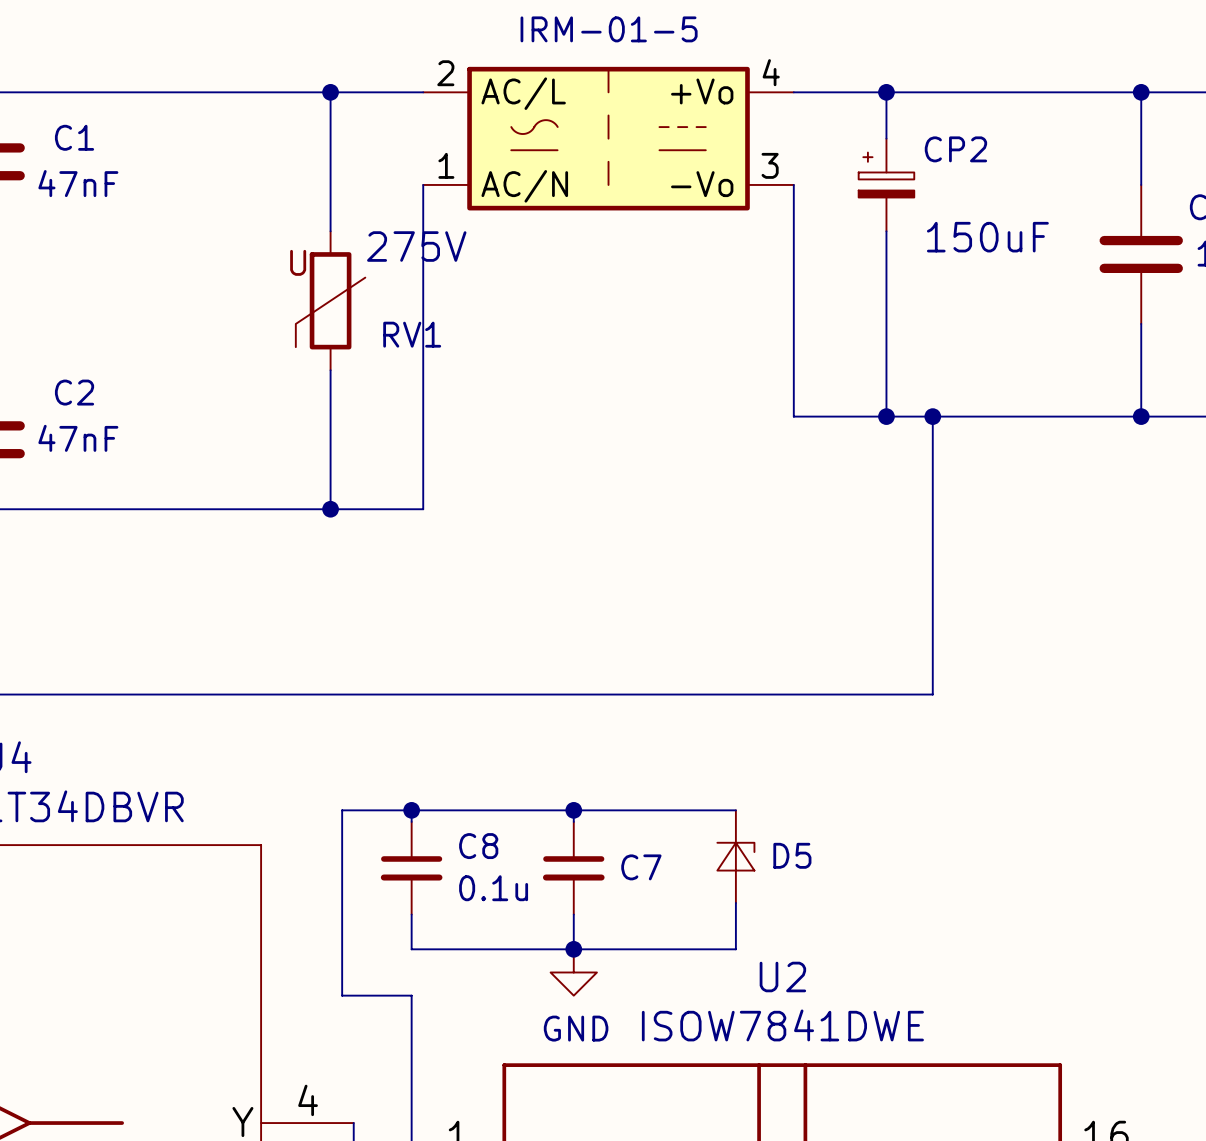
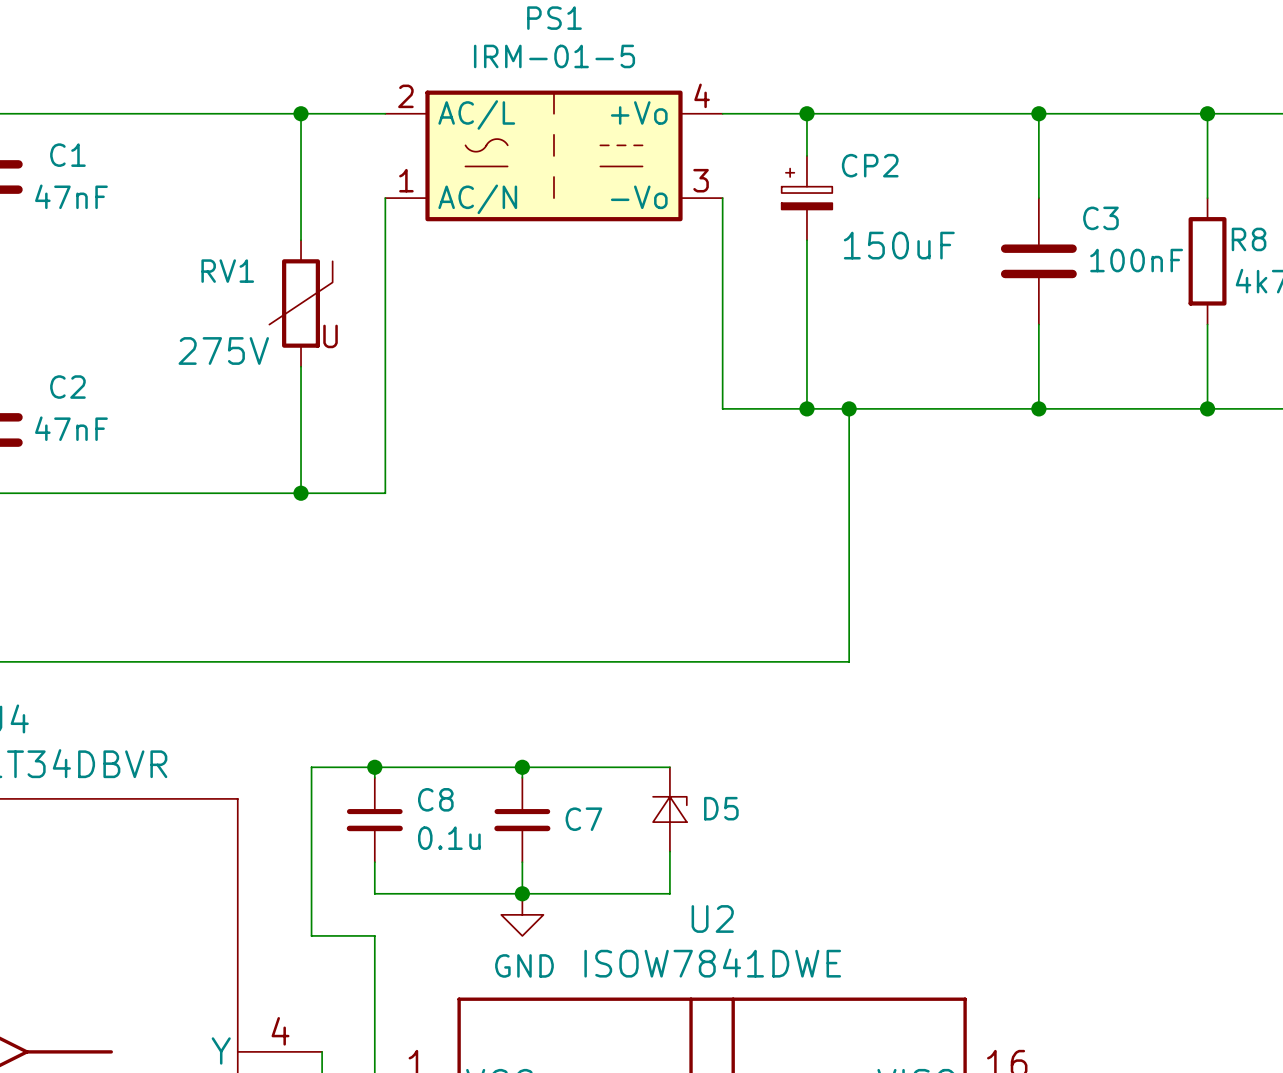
RV1 rotation: 0° (330, 300) -> 180° (301, 303)

